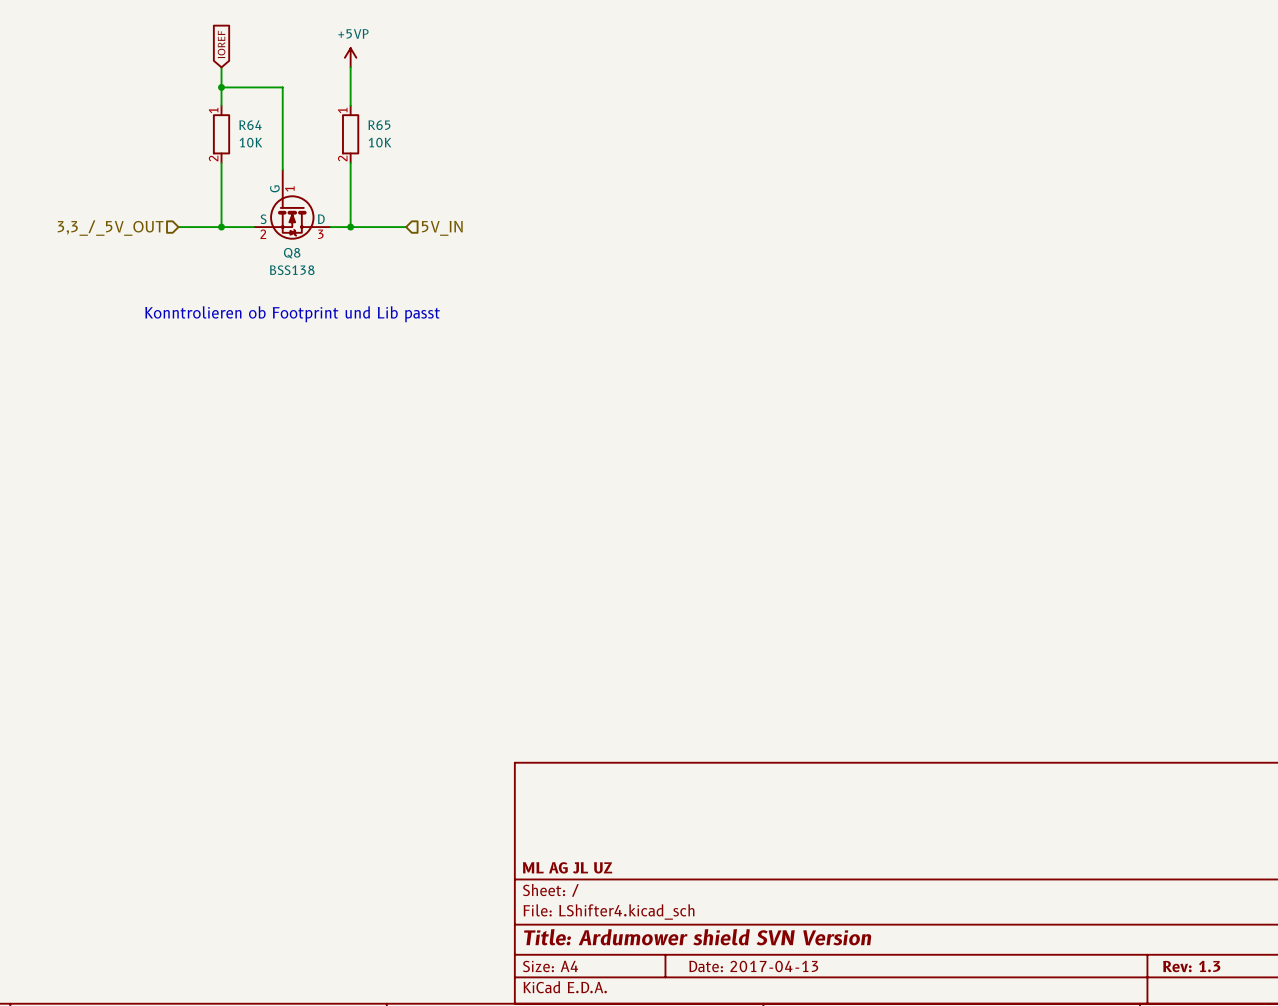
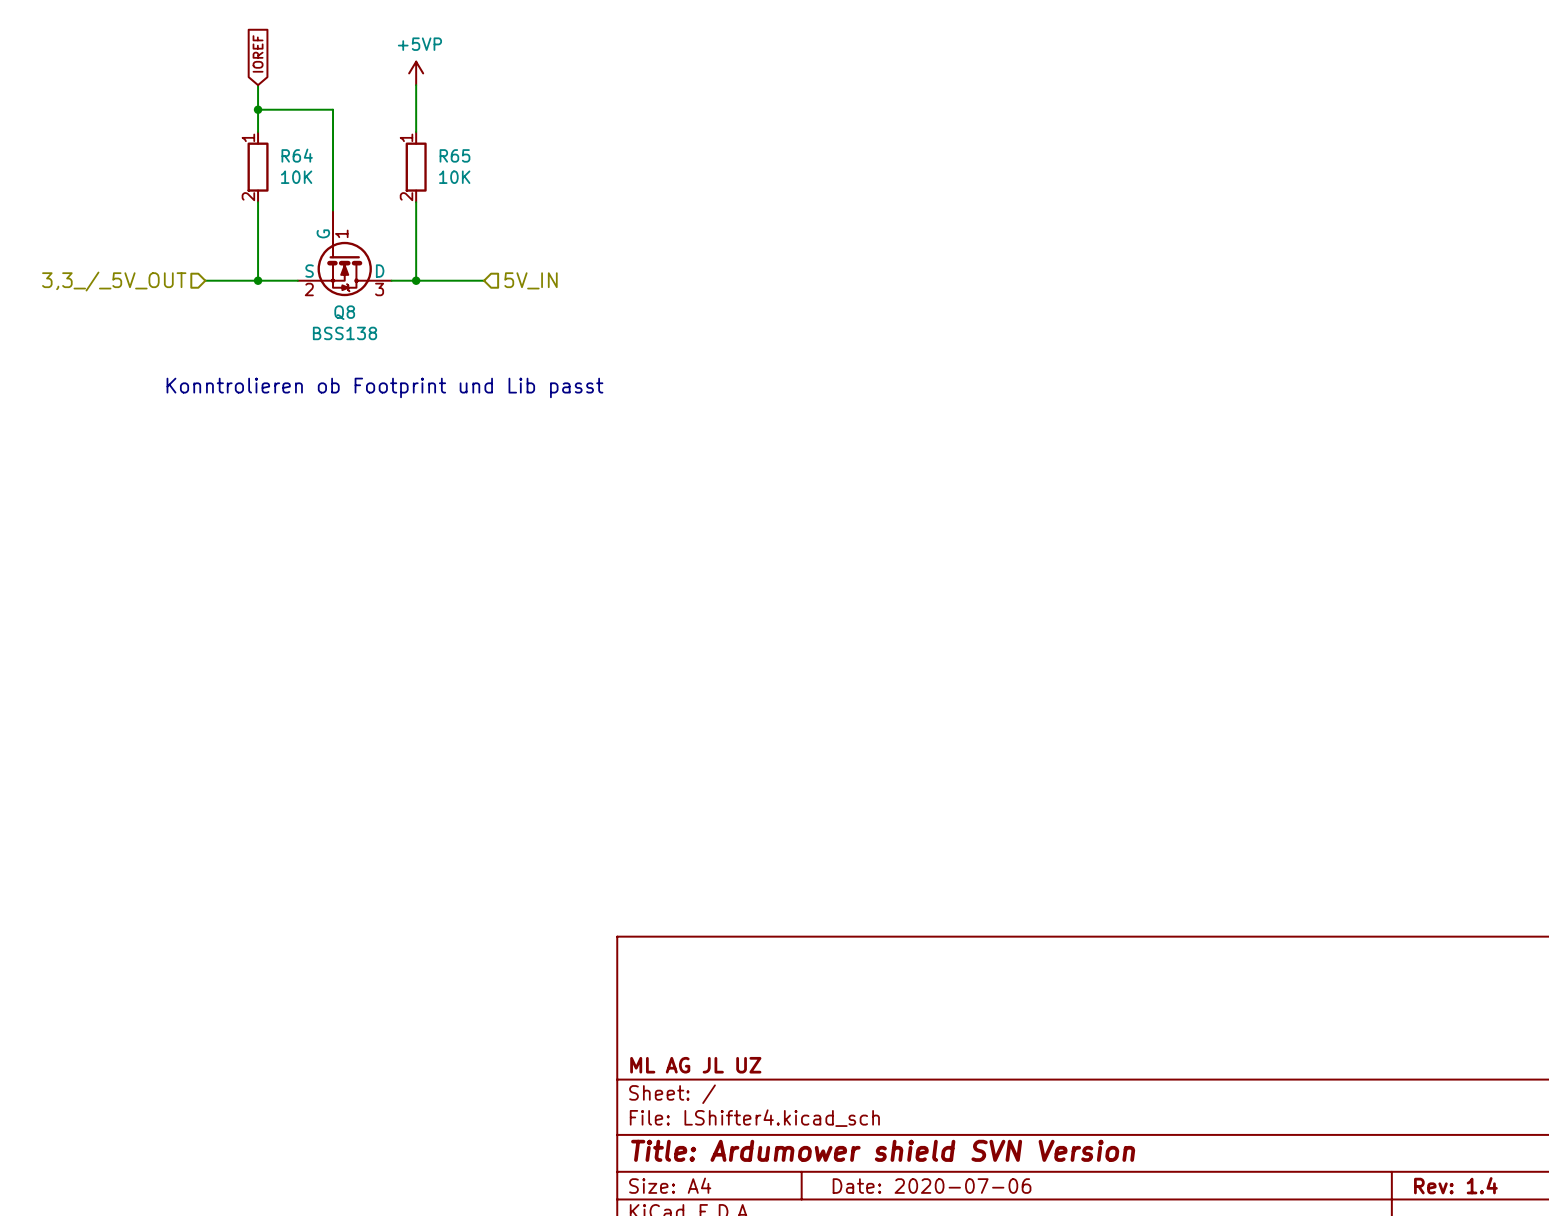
title block: Date: 2017-04-13 (753, 966) -> Date: 2020-07-06 (932, 1186)
title block: Rev: 1.3 (1191, 966) -> Rev: 1.4 (1455, 1185)

